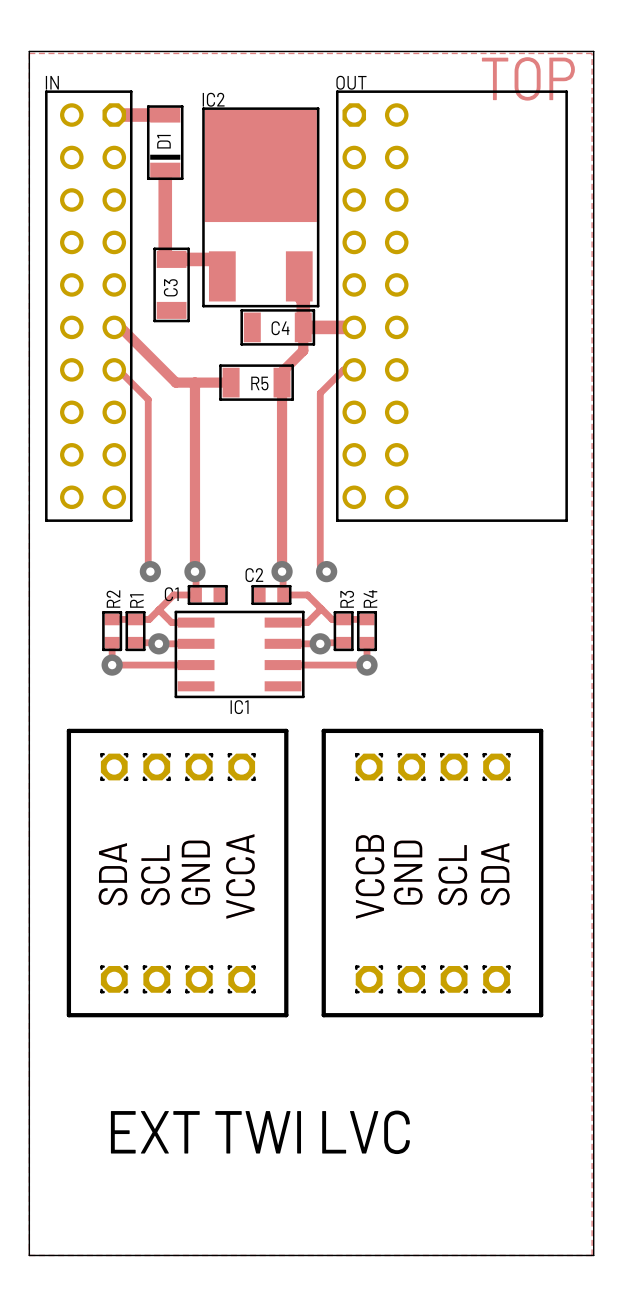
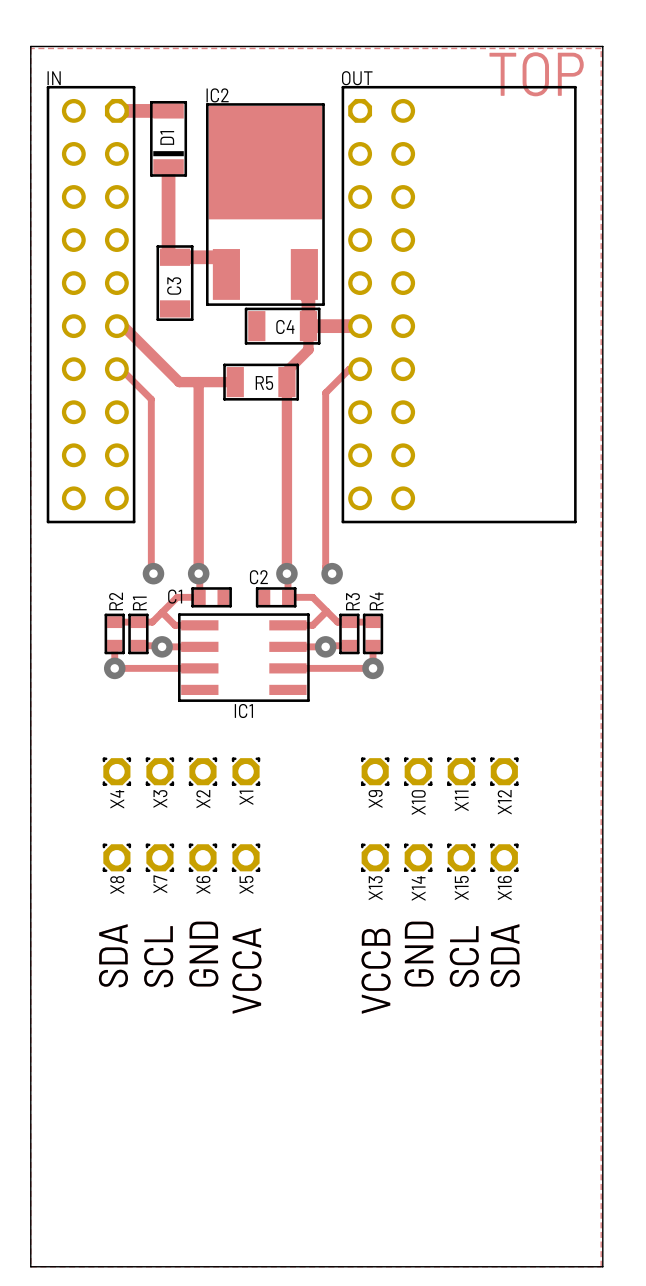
line: (68, 730) (286, 730) (286, 1015) (68, 1015) (68, 730) -> none
line: (323, 730) (541, 730) (541, 1015) (323, 1015) (323, 730) -> none
X1 name: none -> X1 (246, 797)
X3 name: none -> X3 (160, 798)
X9 name: none -> X9 (375, 798)
X4 name: none -> X4 (117, 799)
X2 name: none -> X2 (203, 799)
X11 name: none -> X11 (461, 800)
X10 name: none -> X10 (418, 802)
X12 name: none -> X12 (504, 802)
X8: none -> (116, 857)
X7: none -> (159, 857)
X6: none -> (202, 857)
X5: none -> (246, 857)
X13: none -> (375, 857)
X14: none -> (418, 857)
X15: none -> (461, 857)
X16: none -> (504, 857)
text: GND (195, 872) -> none
text: GND (408, 872) -> none
text: SDA (113, 874) -> none
text: SDA (495, 874) -> none
text: SCL (155, 875) -> none
text: SCL (452, 875) -> none
text: VCCA (240, 876) -> none
text: VCCB (369, 876) -> none
text: none -> GND (203, 954)
text: none -> GND (419, 954)
text: none -> SDA (113, 955)
text: none -> SDA (505, 955)
text: none -> SCL (158, 956)
text: none -> SCL (464, 956)
text: none -> VCCA (246, 970)
text: none -> VCCB (376, 971)
part: (114, 979) -> none
part: (156, 979) -> none
part: (199, 979) -> none
part: (241, 979) -> none
part: (369, 979) -> none
part: (411, 979) -> none
part: (454, 979) -> none
part: (496, 979) -> none
text: EXT TWI LVC (260, 1132) -> none

